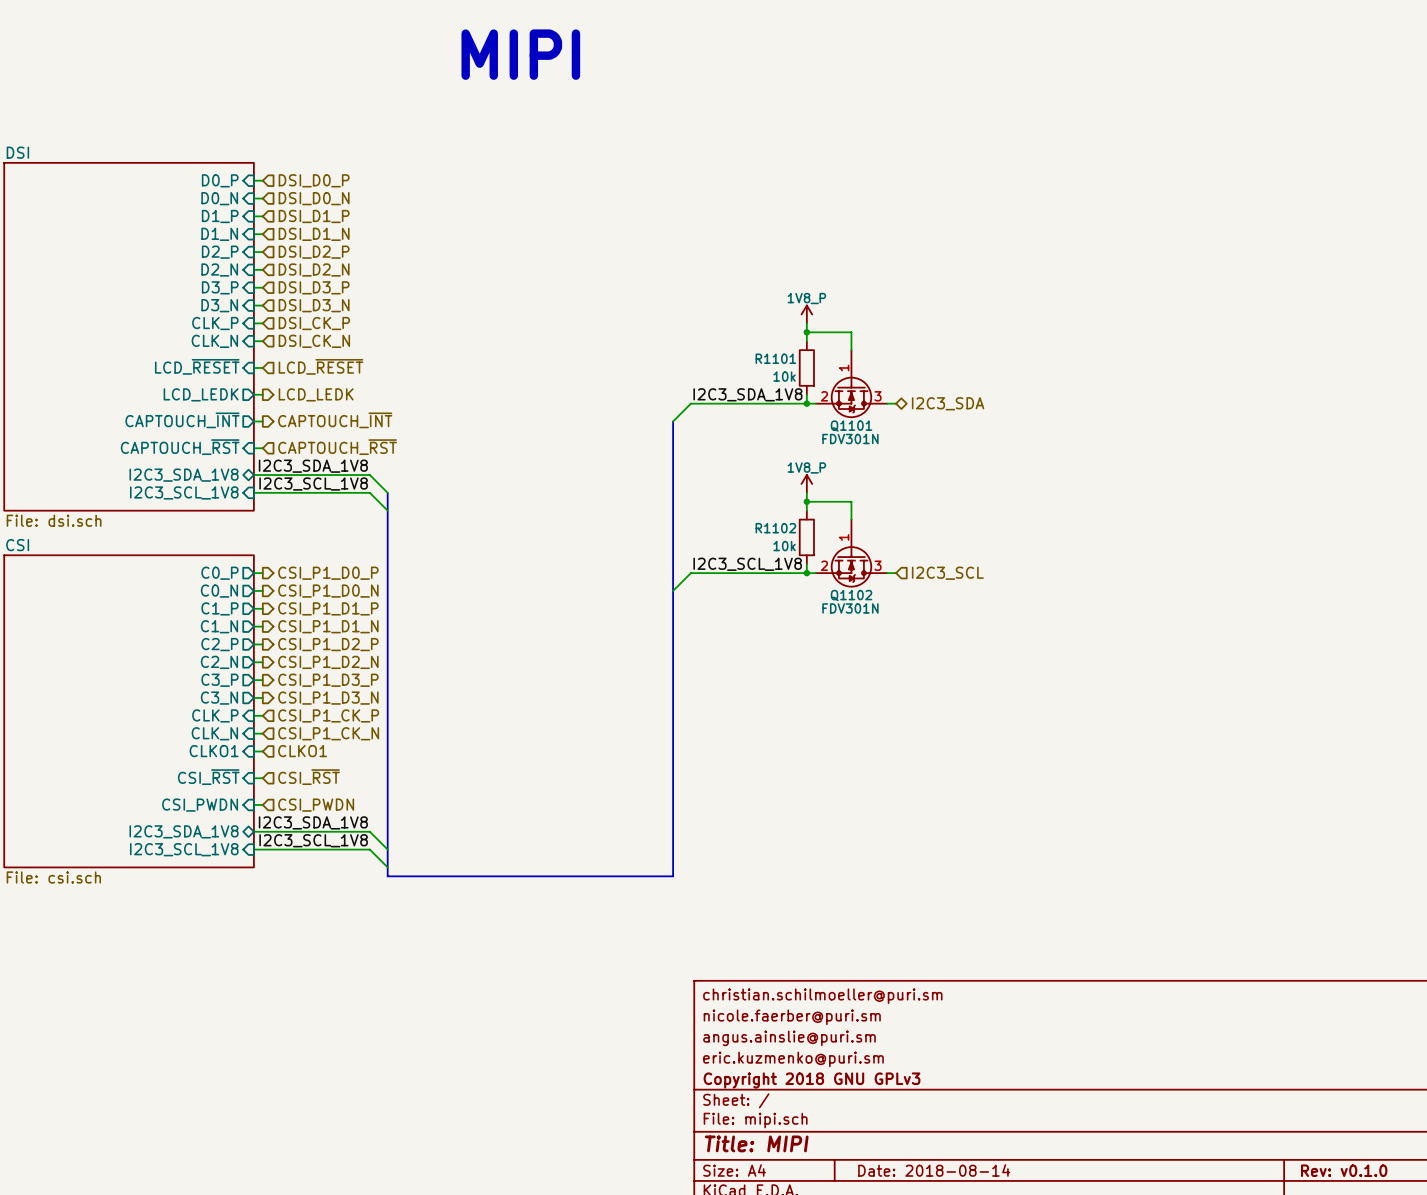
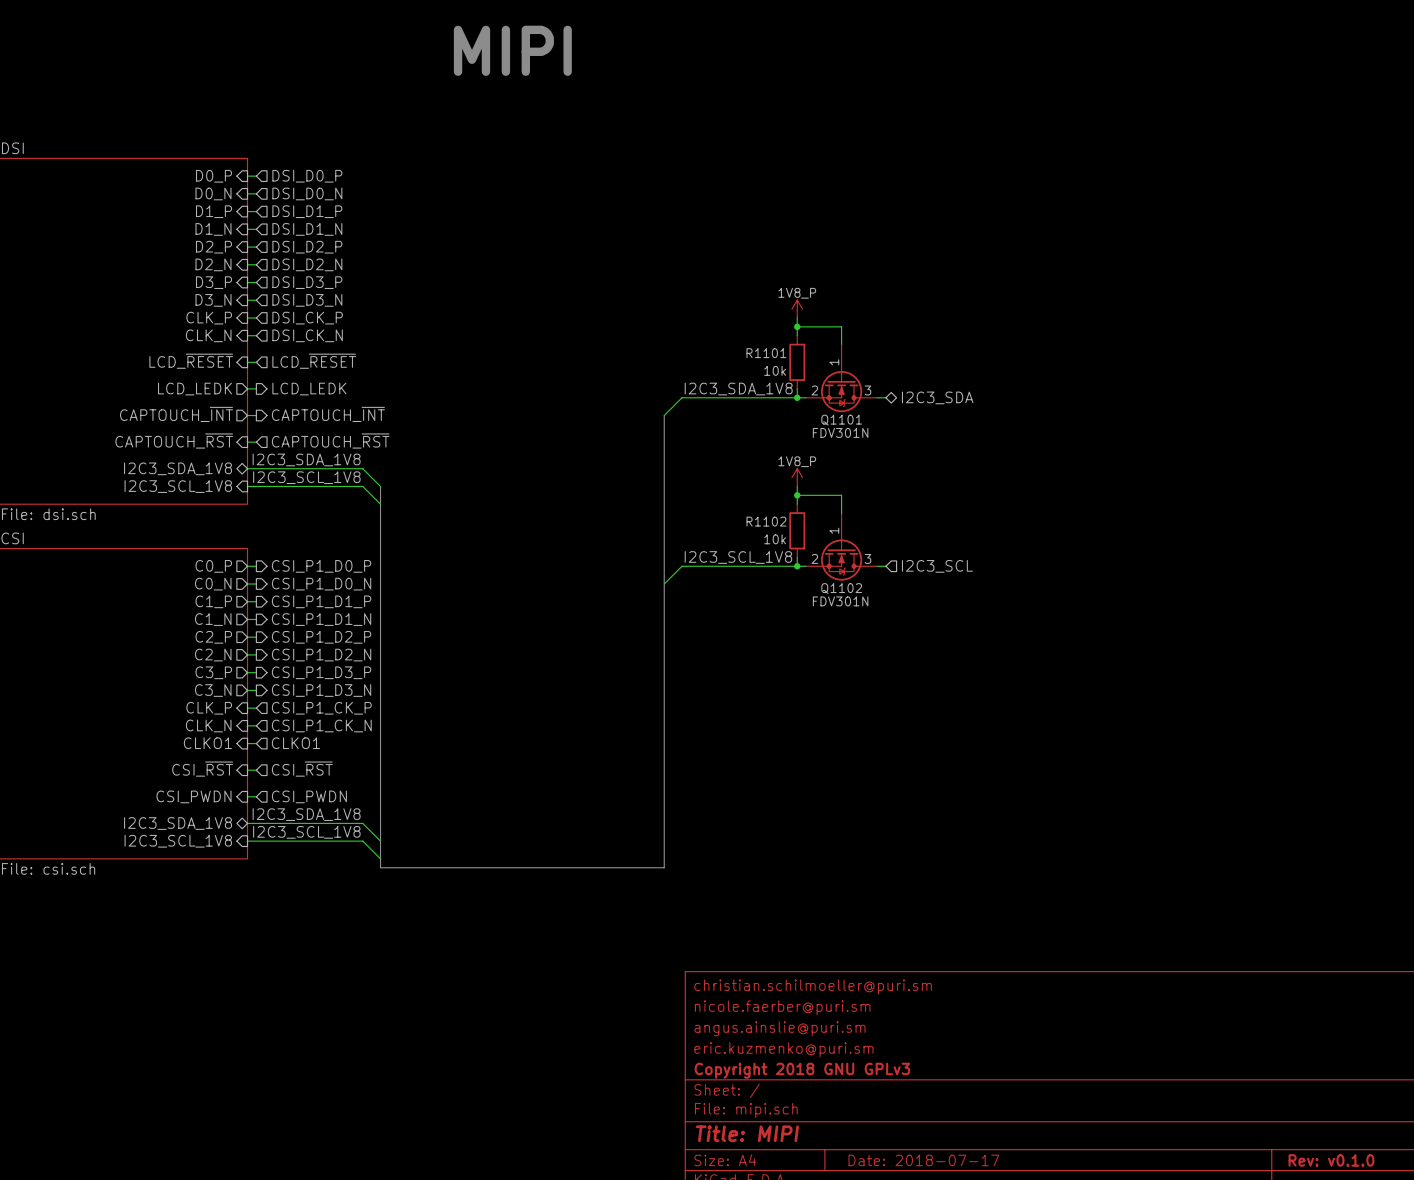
title block: Date: 2018-08-14 (934, 1170) -> Date: 2018-07-17 (923, 1160)

